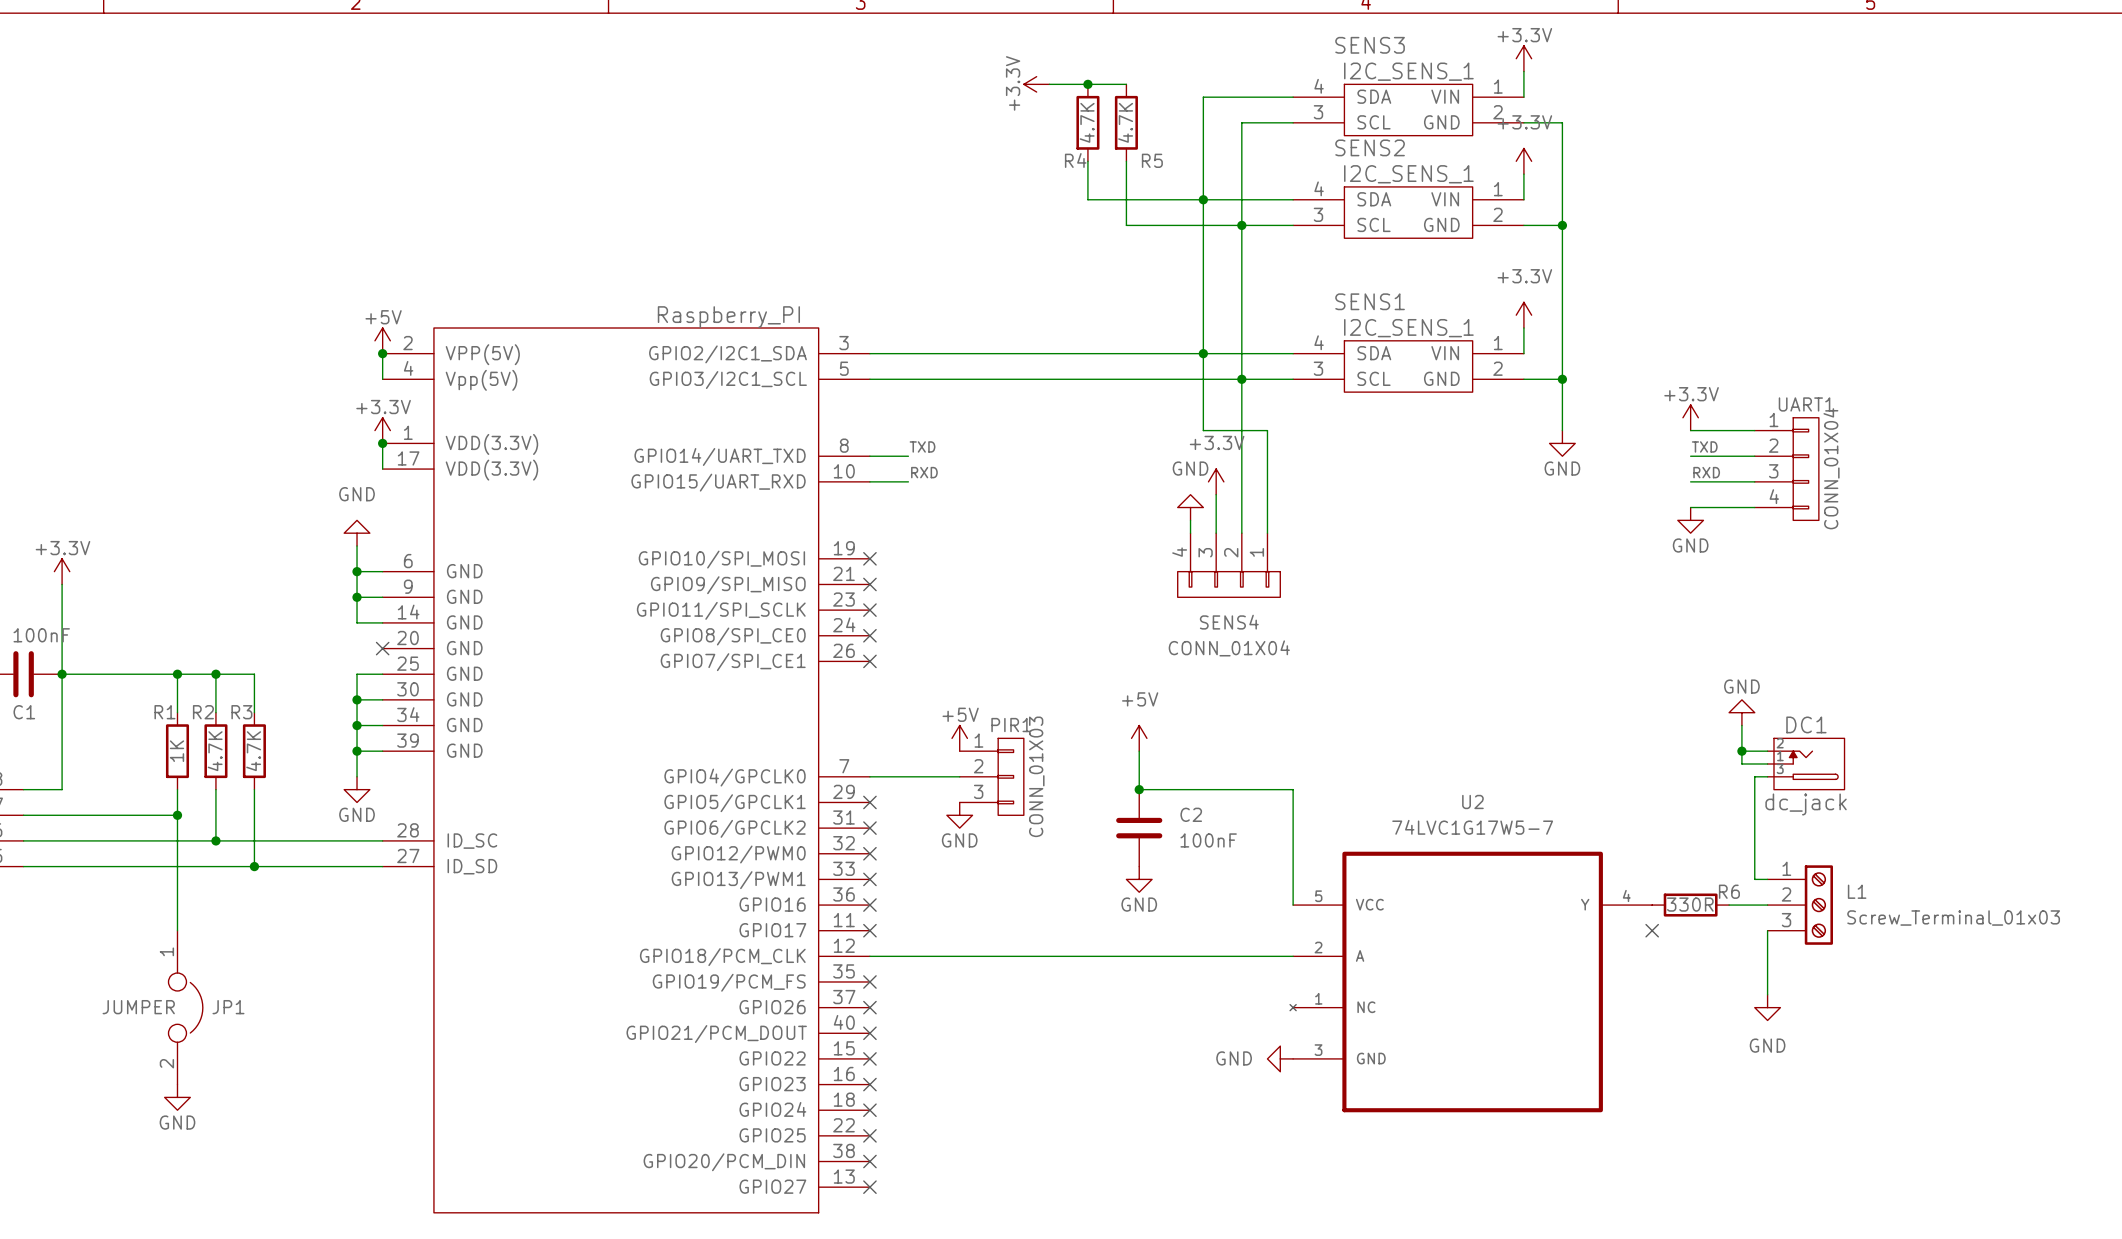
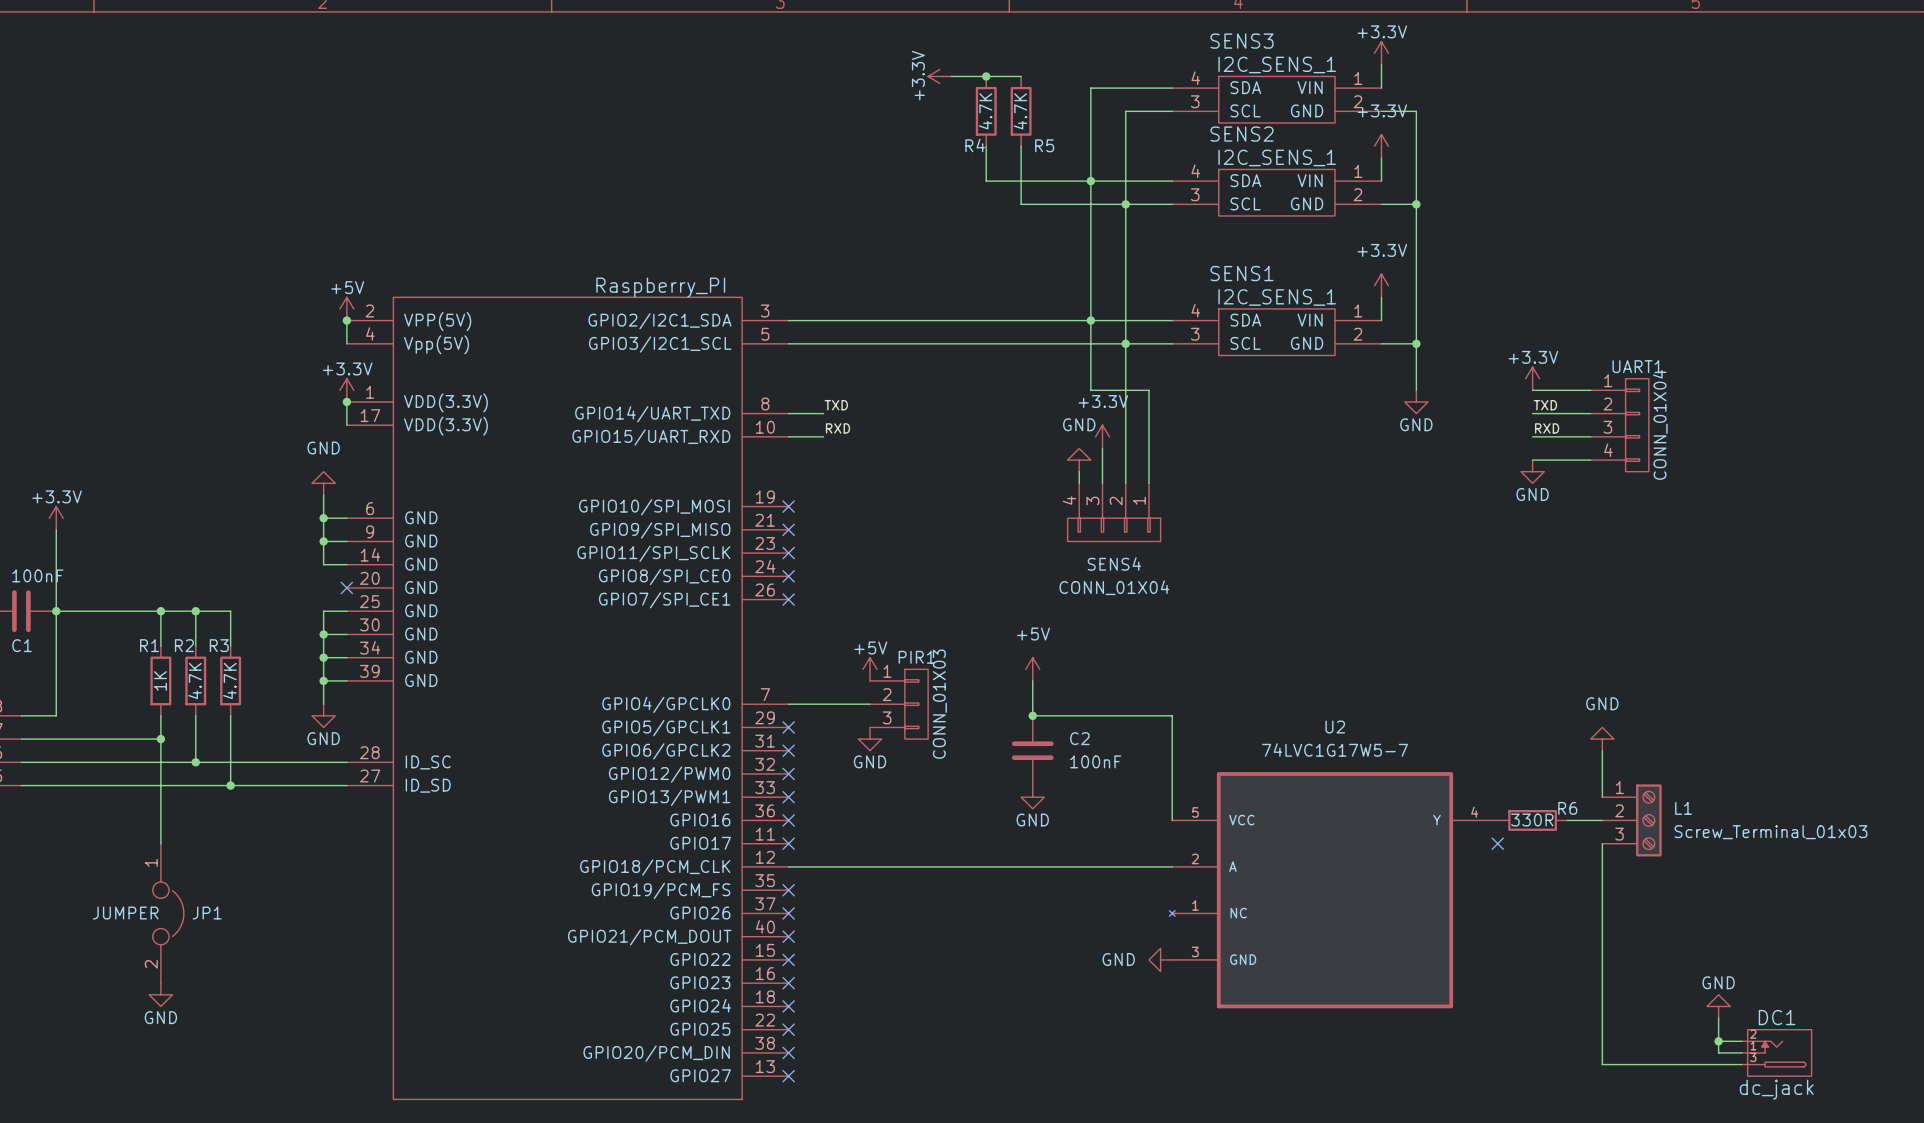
power symbol: GND (1741, 712) -> none
wire: (1741, 725) (1741, 763) (1767, 763) -> none
wire: (1741, 751) (1767, 751) -> none
junction: (1741, 751) -> none
DC1 position: (1806, 763) -> (1776, 1052)
wire: (1767, 776) (1754, 776) (1754, 879) (1767, 879) -> (1602, 750) (1602, 797)
power symbol: none -> GND (1602, 739)
wire: none -> (1602, 901) (1602, 1064) (1741, 1064)
power symbol: GND (1767, 1007) -> none
power symbol: none -> GND (1718, 1006)
wire: none -> (1718, 1018) (1718, 1052) (1741, 1052)
wire: none -> (1718, 1041) (1741, 1041)
junction: none -> (1718, 1041)

